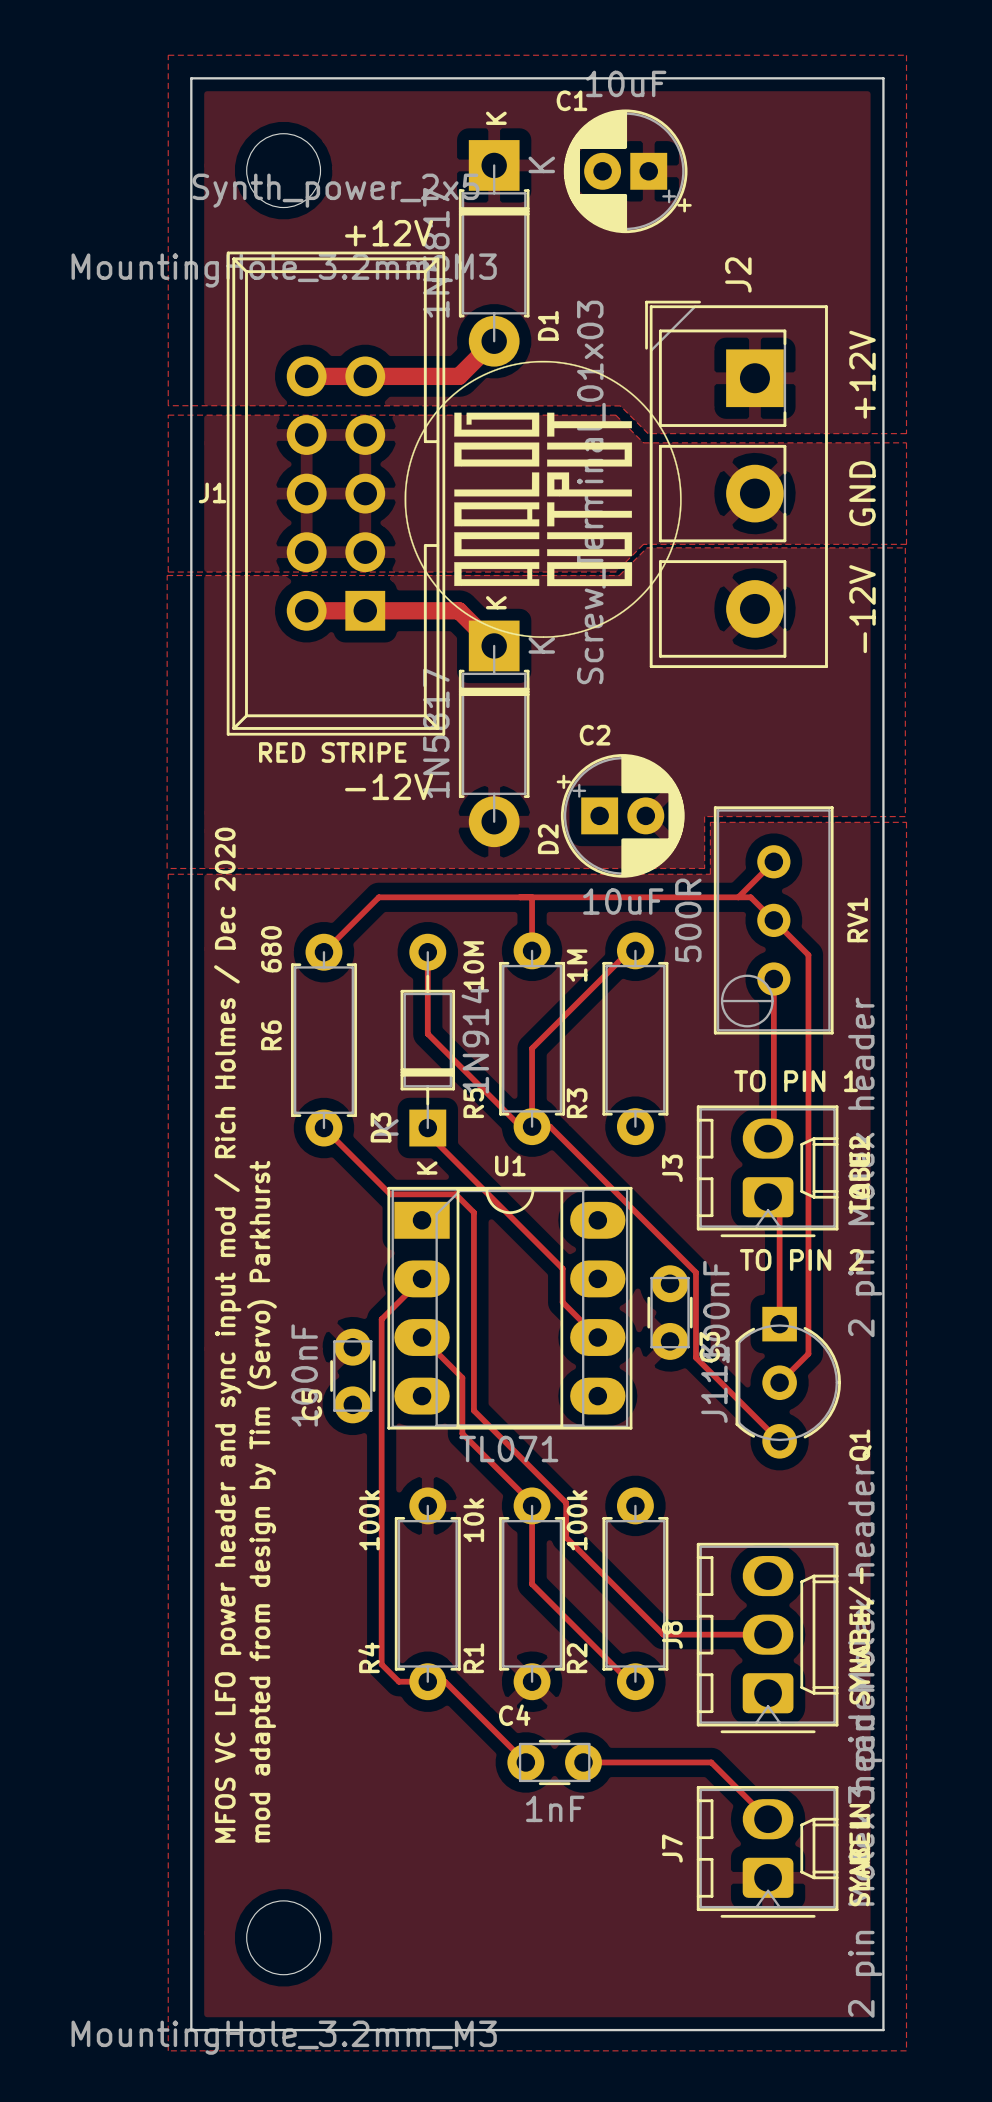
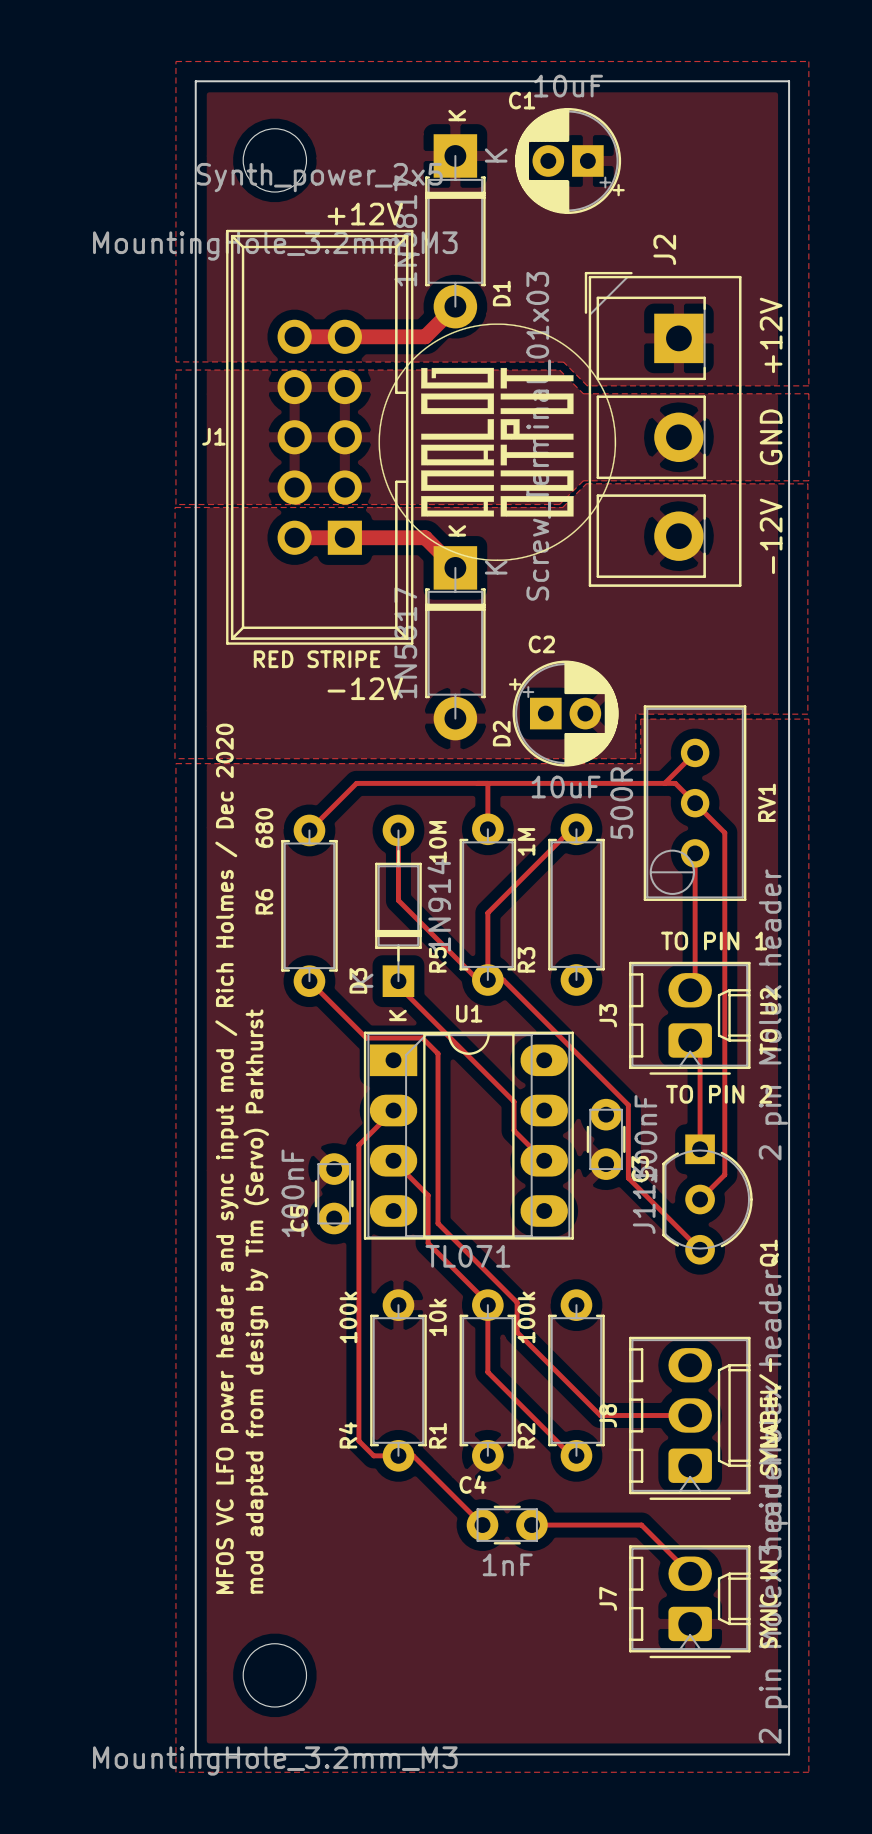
J3 footprint: [696, 1105, 839, 1238] -> [629, 961, 751, 1075]
J7 footprint: [696, 1785, 839, 1918] -> [629, 1545, 751, 1659]

